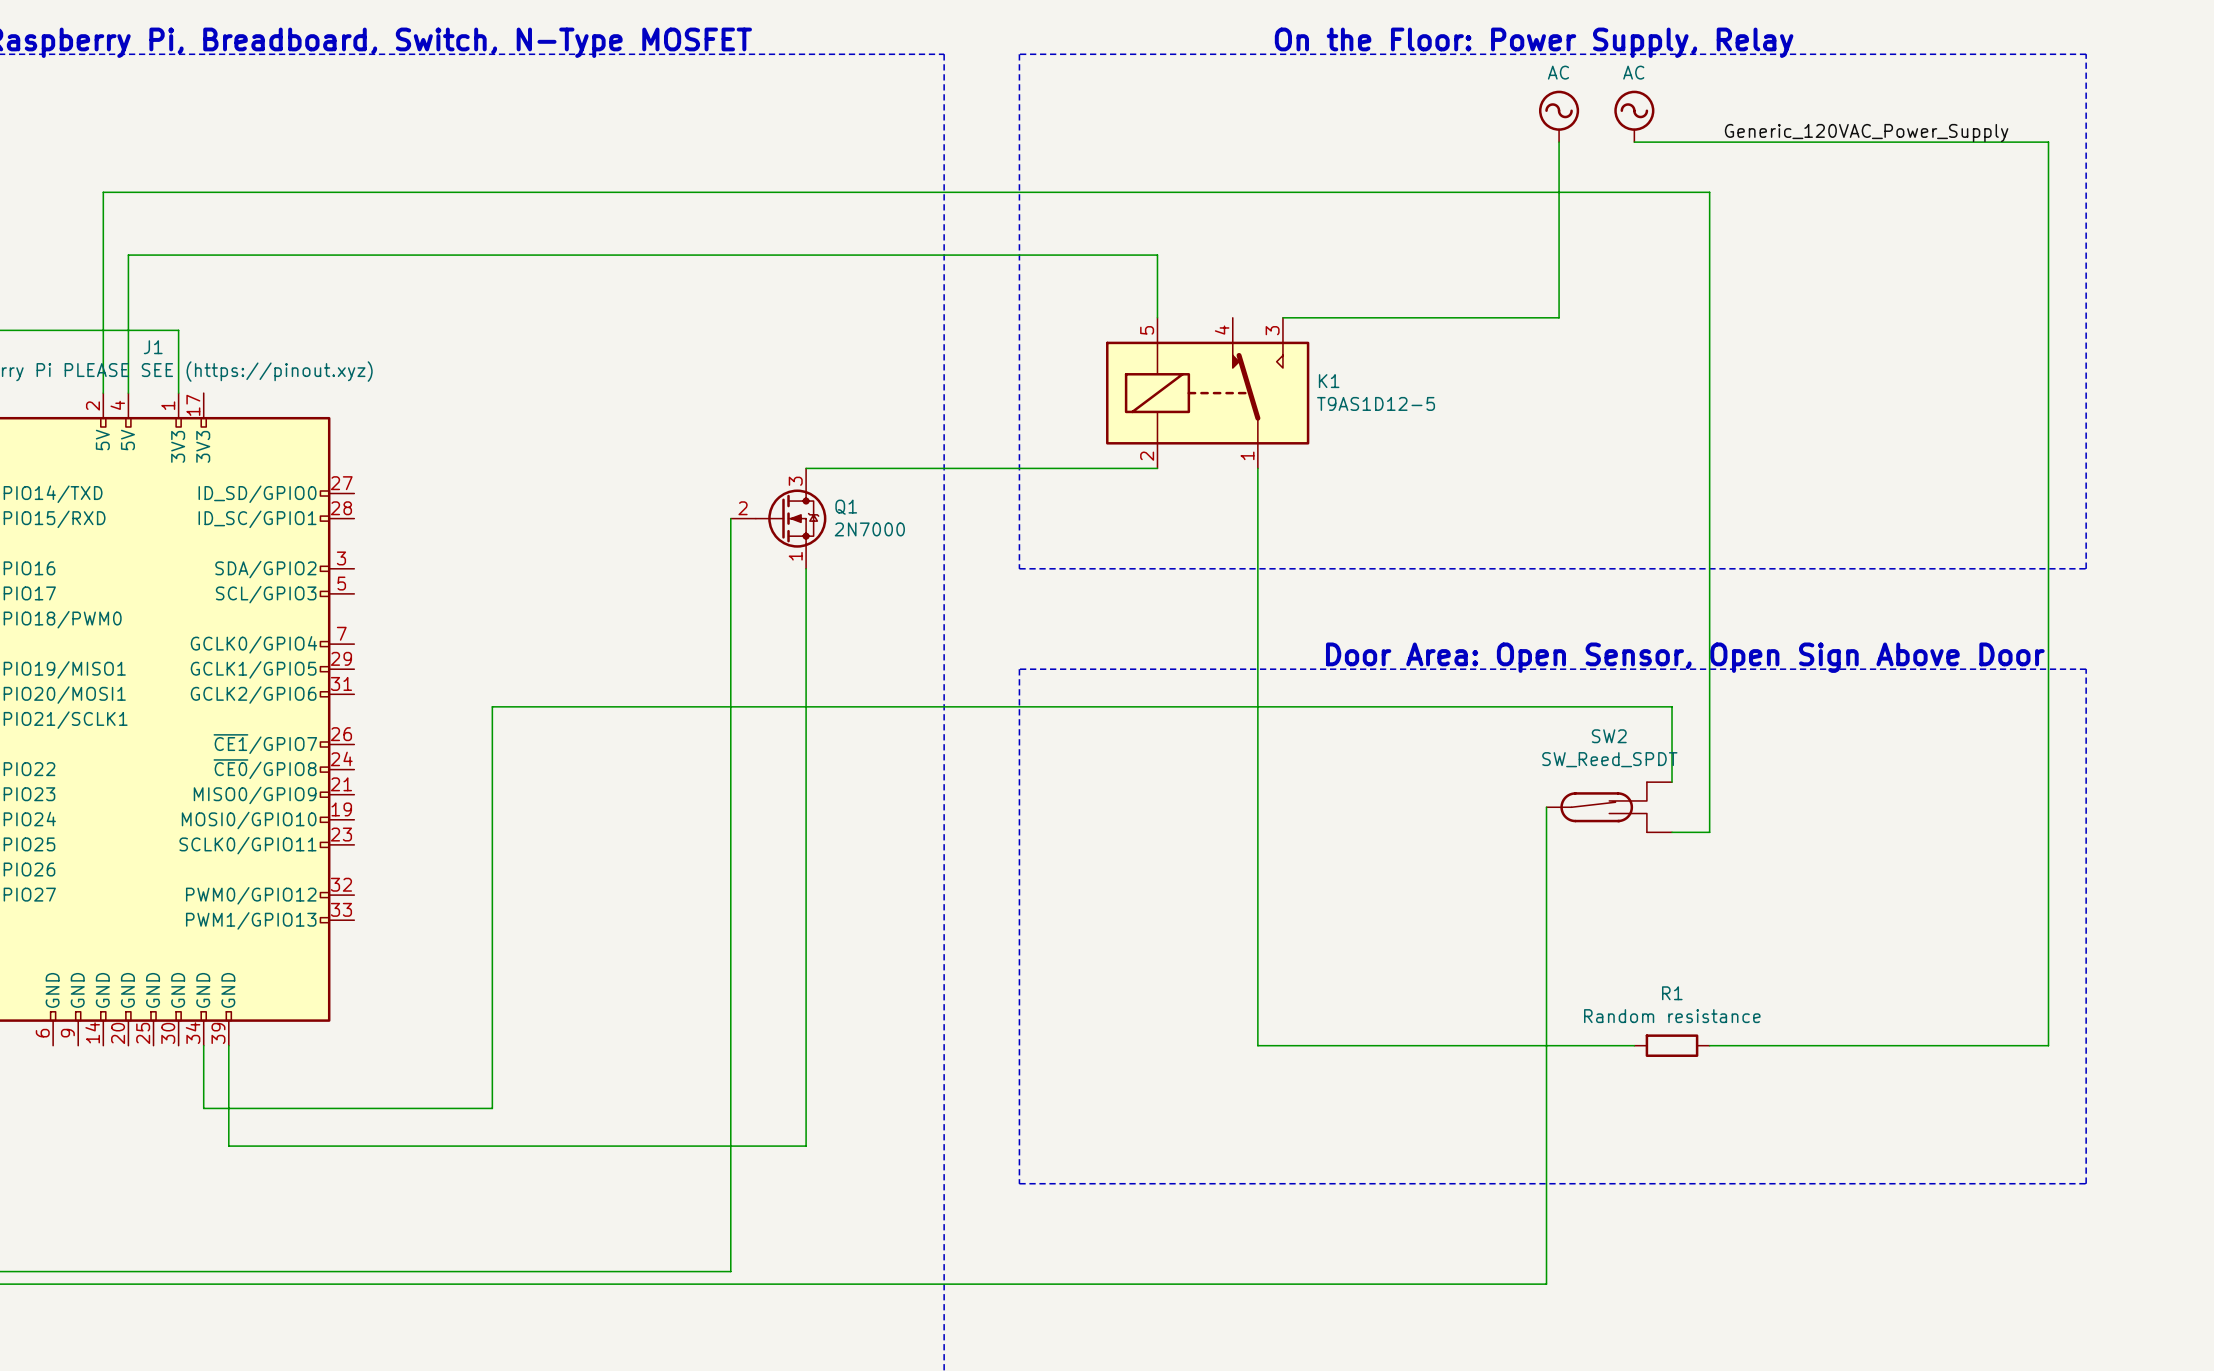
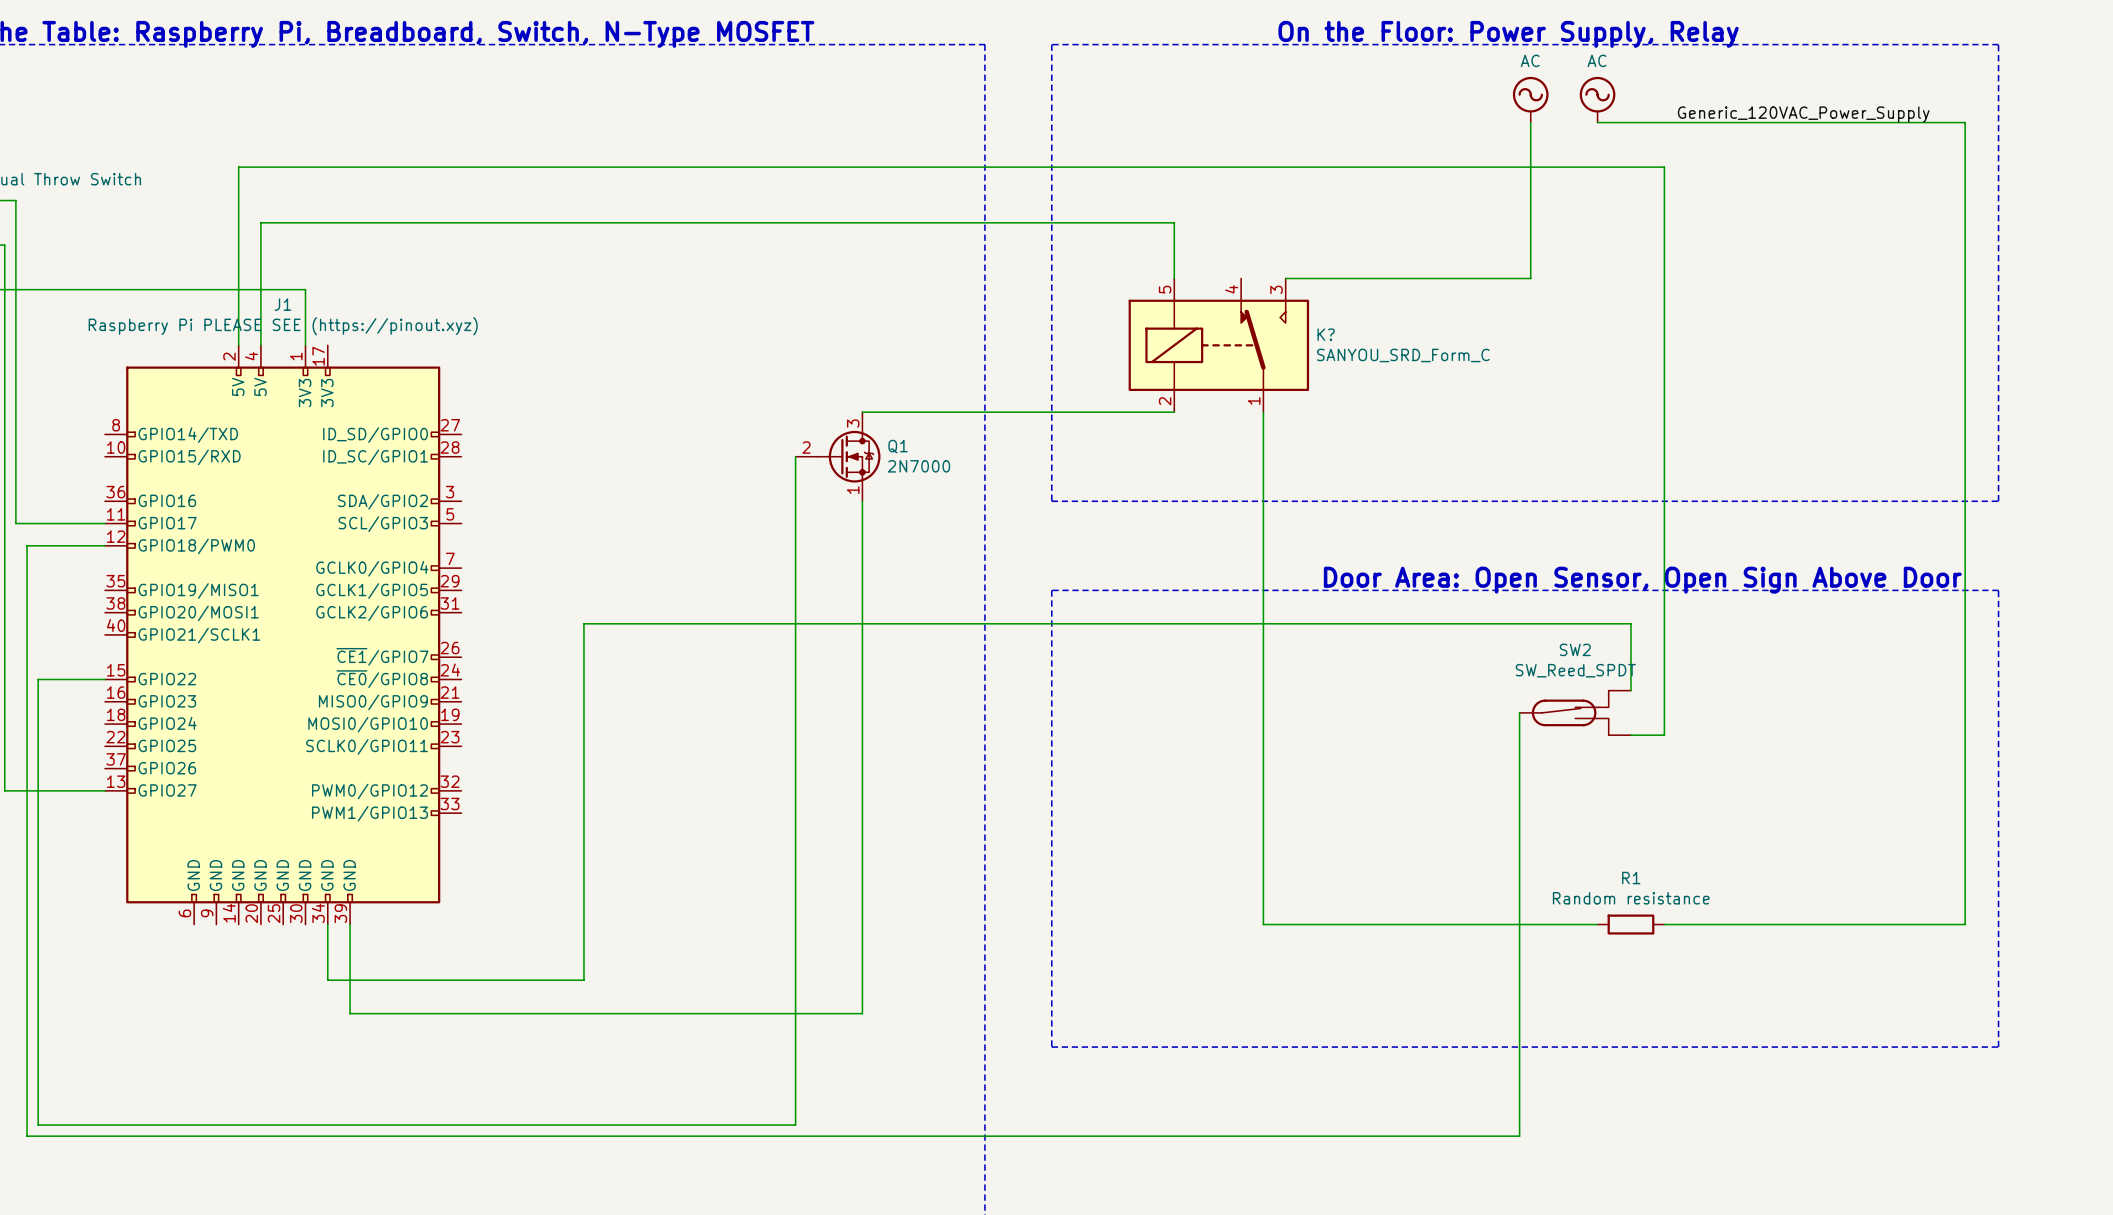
K1 name: K1 (1329, 381) -> K? (1326, 334)
K1 value: T9AS1D12-5 (1376, 403) -> SANYOU_SRD_Form_C (1403, 355)

